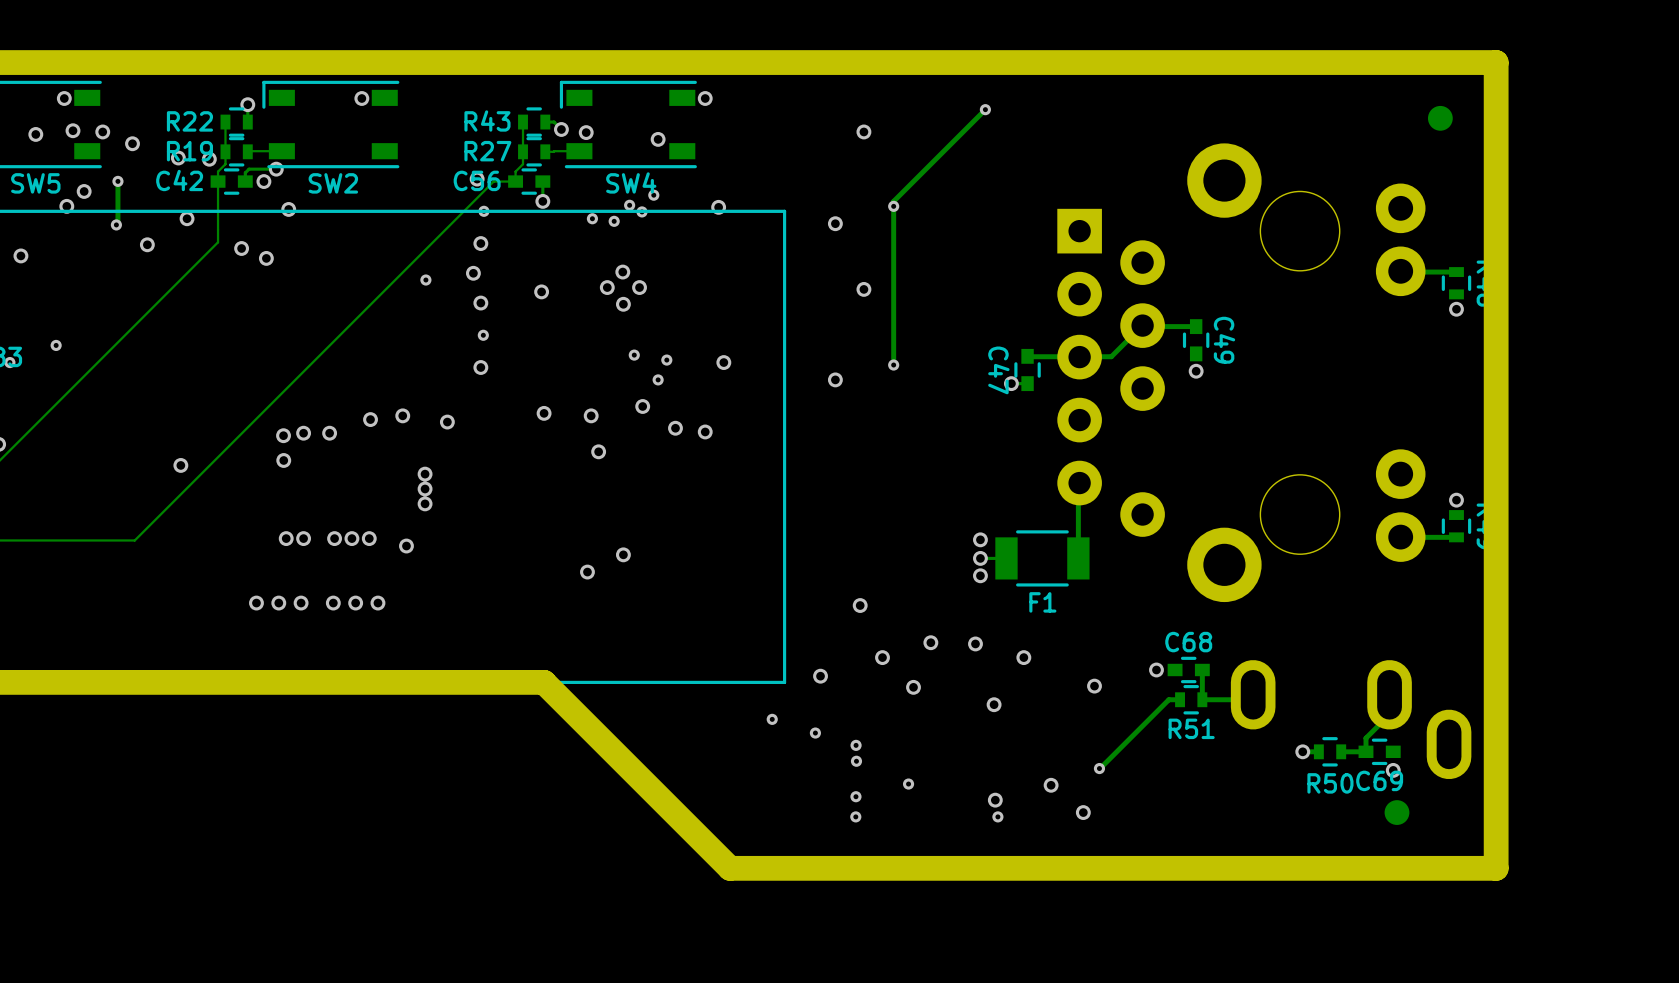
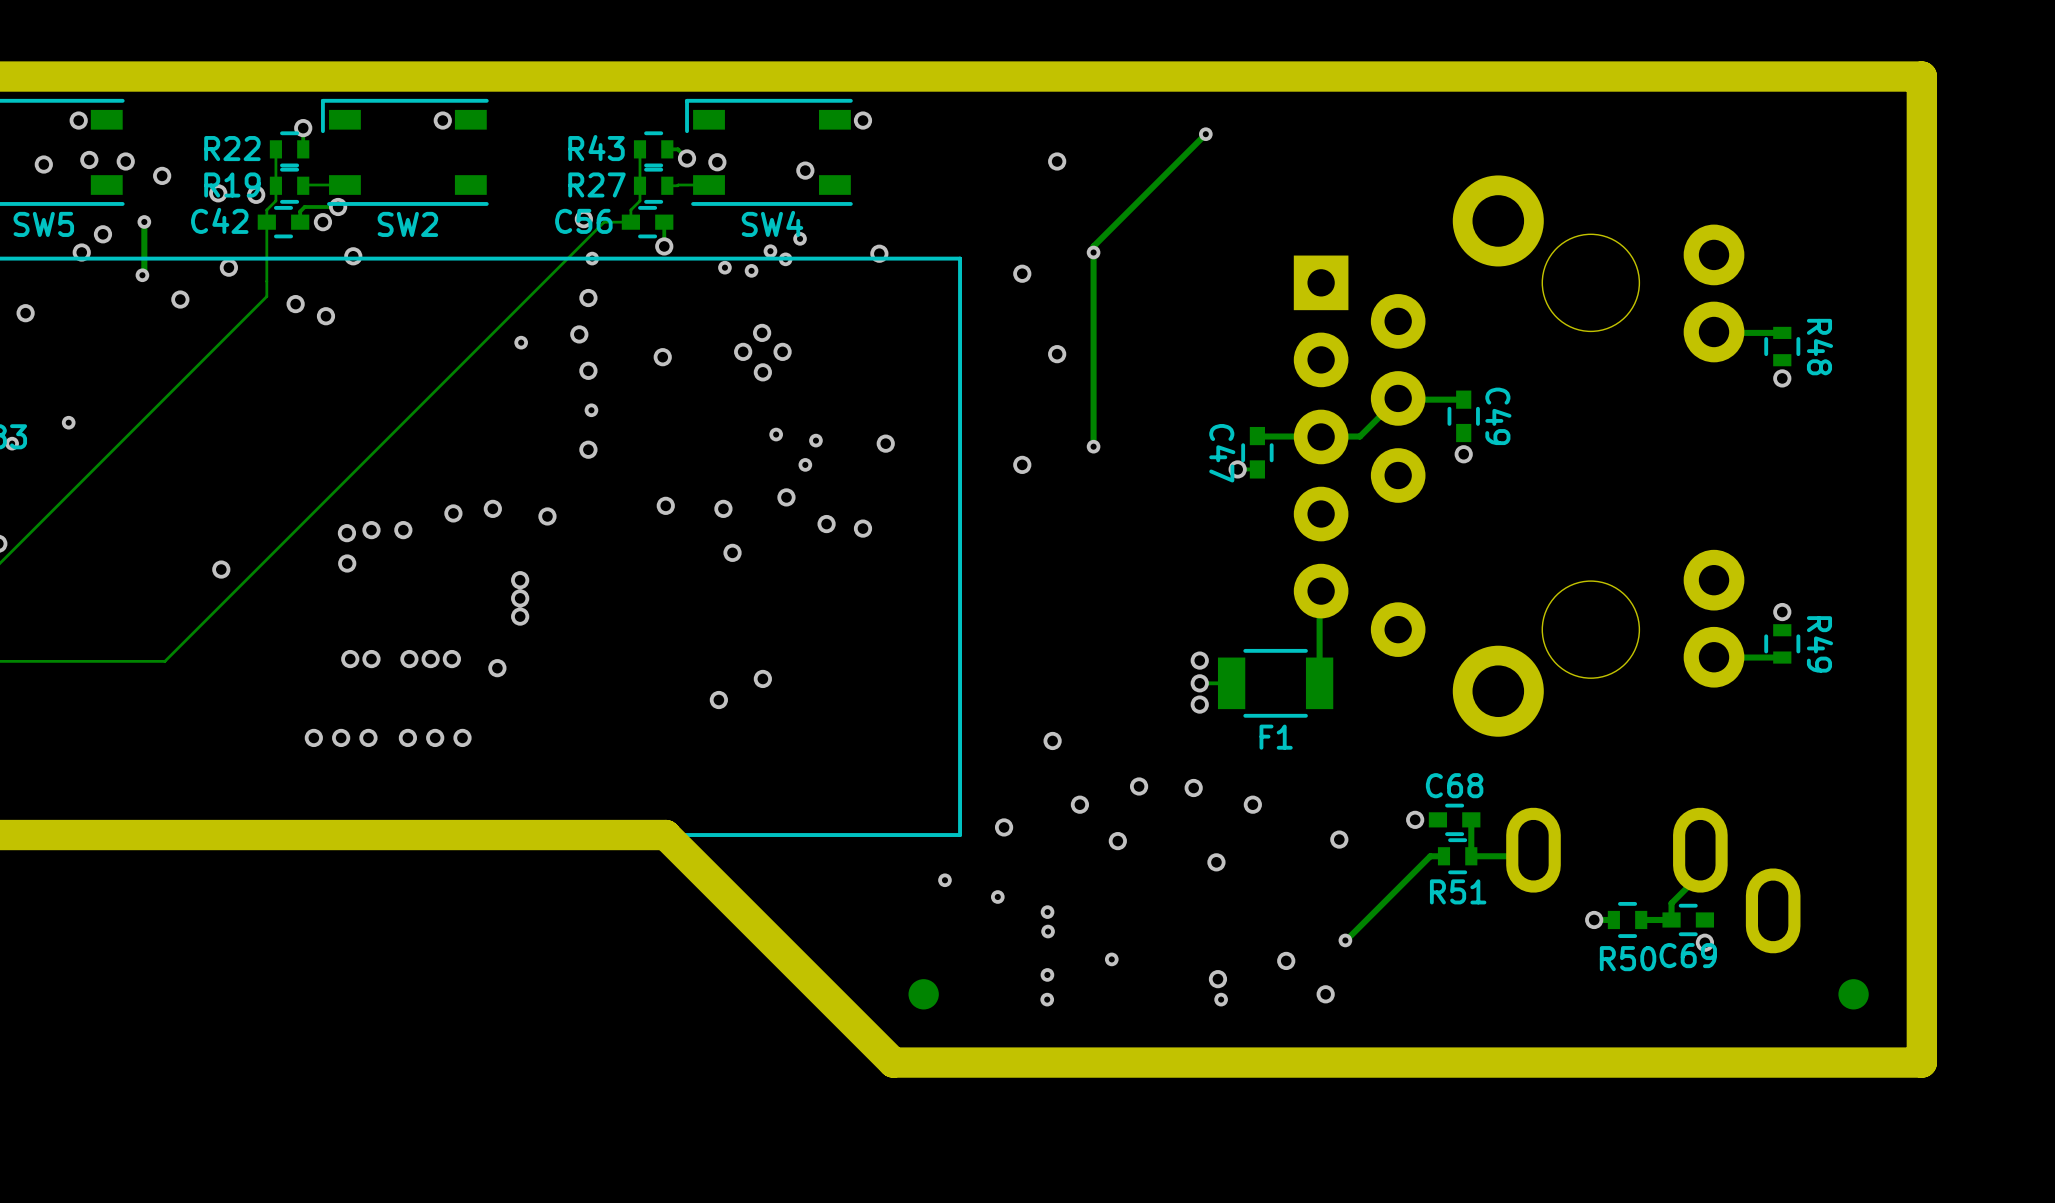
board edge: (1496, 62) (1496, 868) -> (1830, 76) (1921, 76) (1921, 1062) (1830, 1062)
part: (1440, 118) -> none
part: none -> (923, 994)
part position: (1396, 812) -> (1853, 994)

